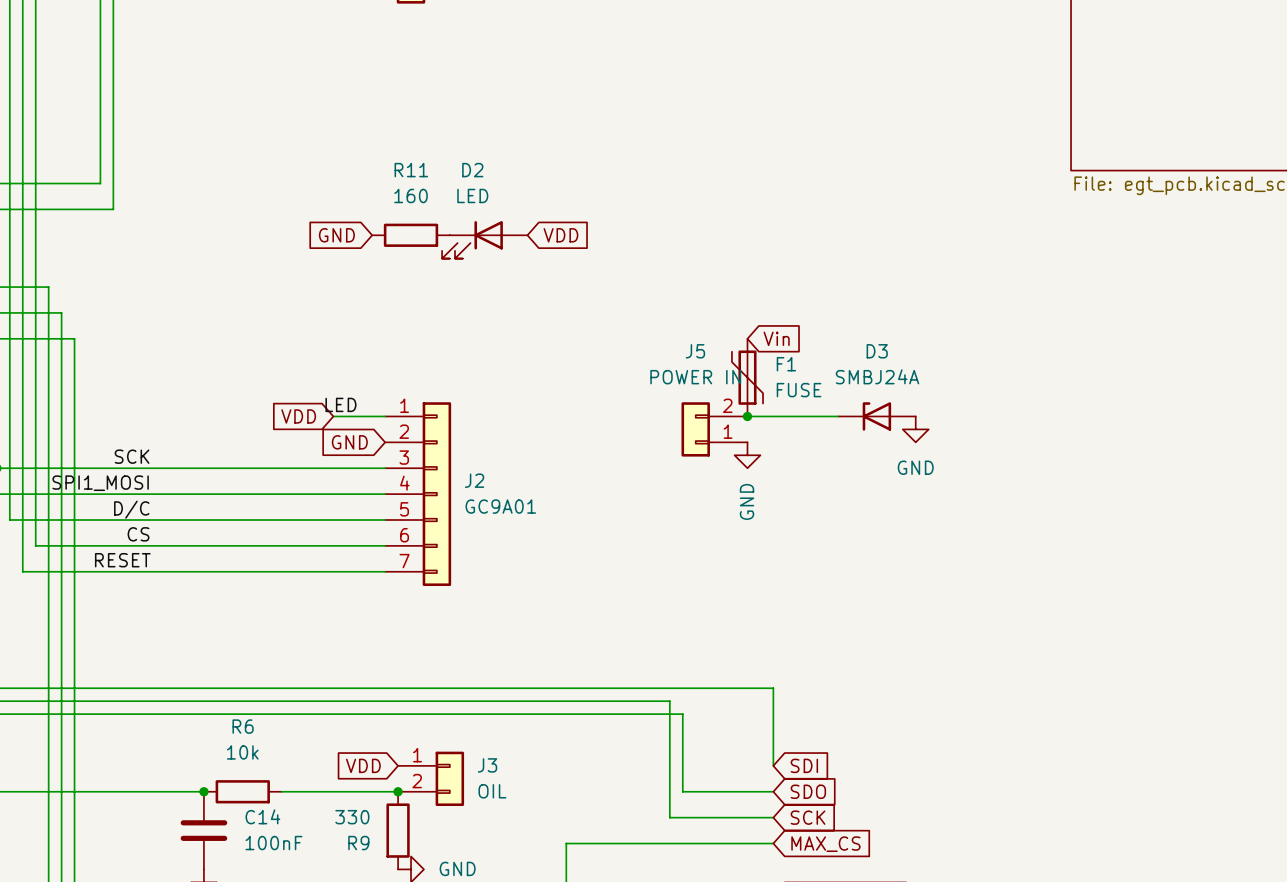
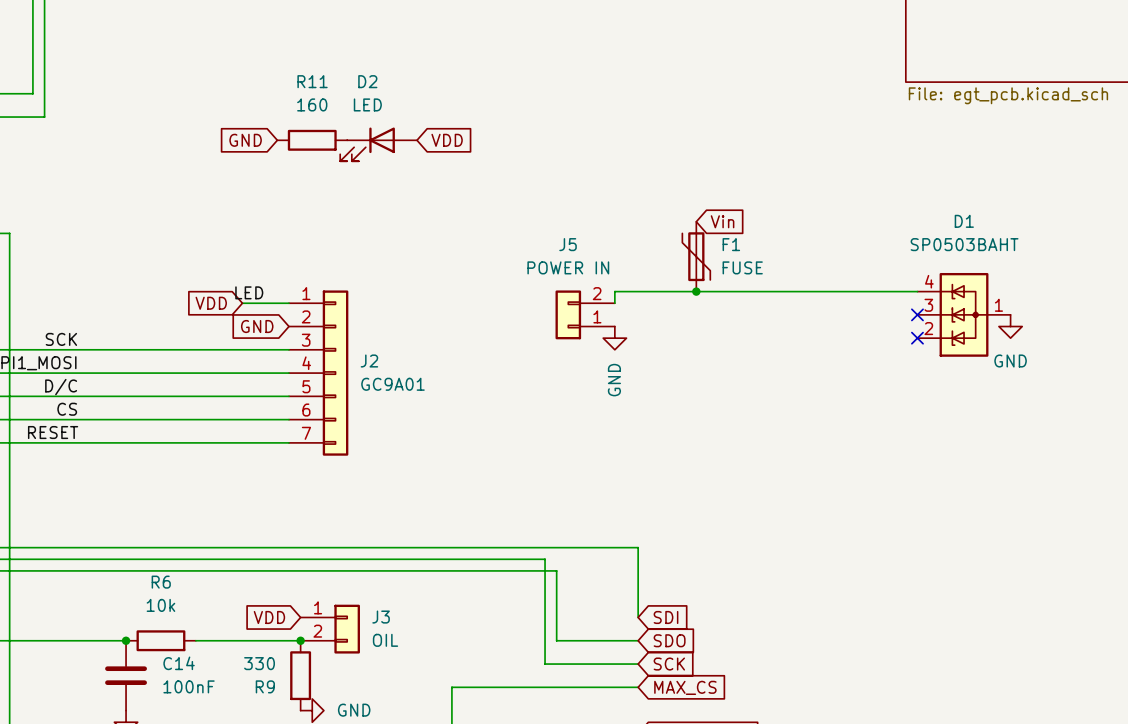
global label position: Vin (776, 338) -> Vin (722, 221)
F1 position: (747, 377) -> (696, 256)
junction: none -> (696, 291)
wire: (747, 416) (838, 416) -> (614, 303) (614, 291) (917, 291)
junction: (747, 416) -> none
D3: SMBJ24A (876, 416) -> none
power symbol: GND (915, 429) -> none
no-connect mark: none -> (917, 314)
D1: none -> SP0503BAHT (964, 314)
power symbol: none -> GND (1010, 326)
no-connect mark: none -> (917, 338)

